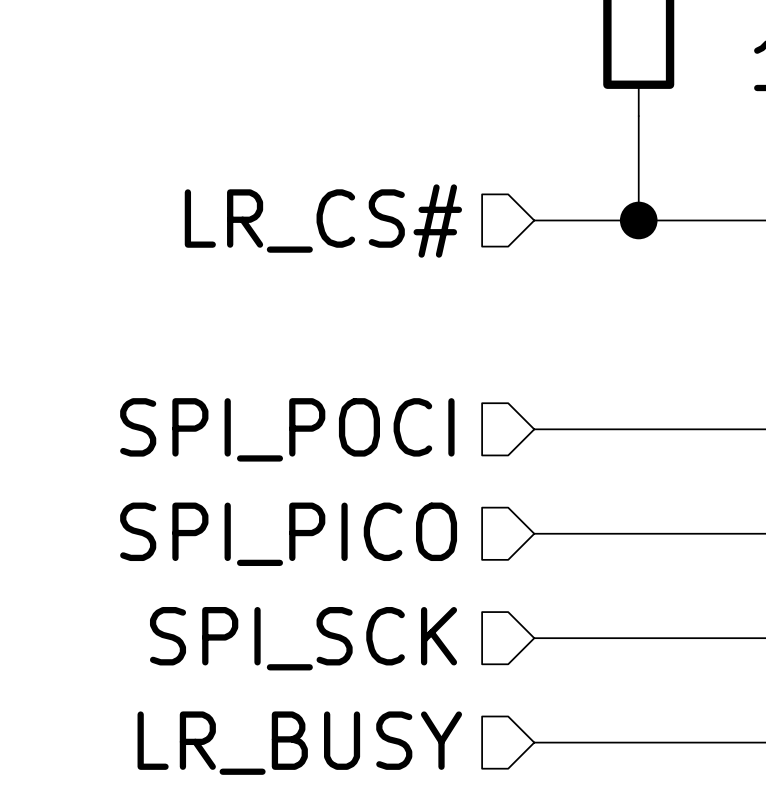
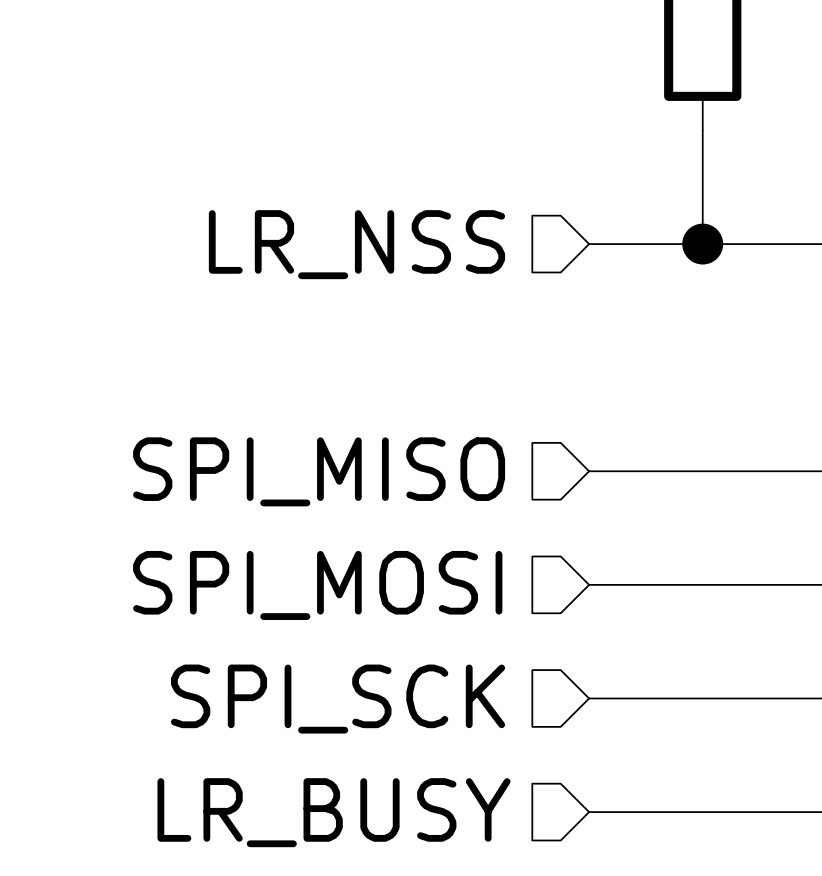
hierarchical label: LR_CS# (323, 221) -> LR_NSS (356, 244)
hierarchical label: SPI_POCI (287, 429) -> SPI_MISO (319, 471)
hierarchical label: SPI_PICO (288, 534) -> SPI_MOSI (317, 585)

